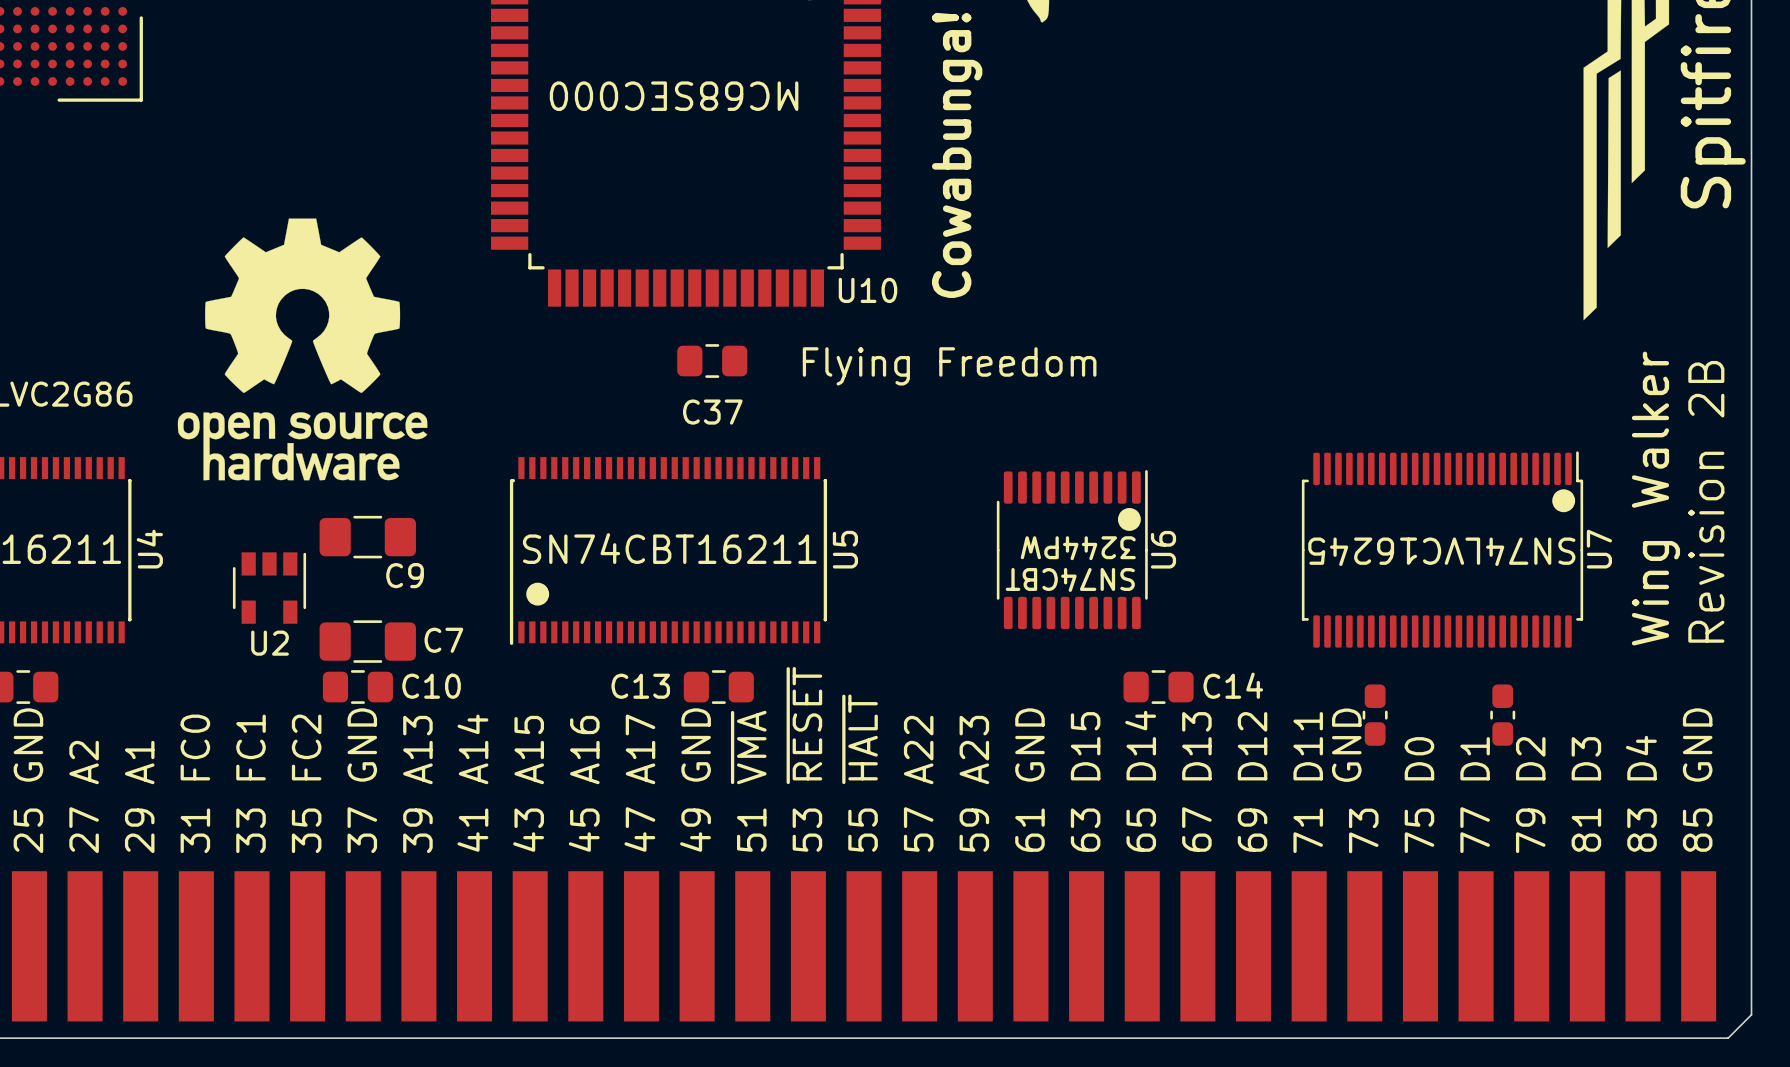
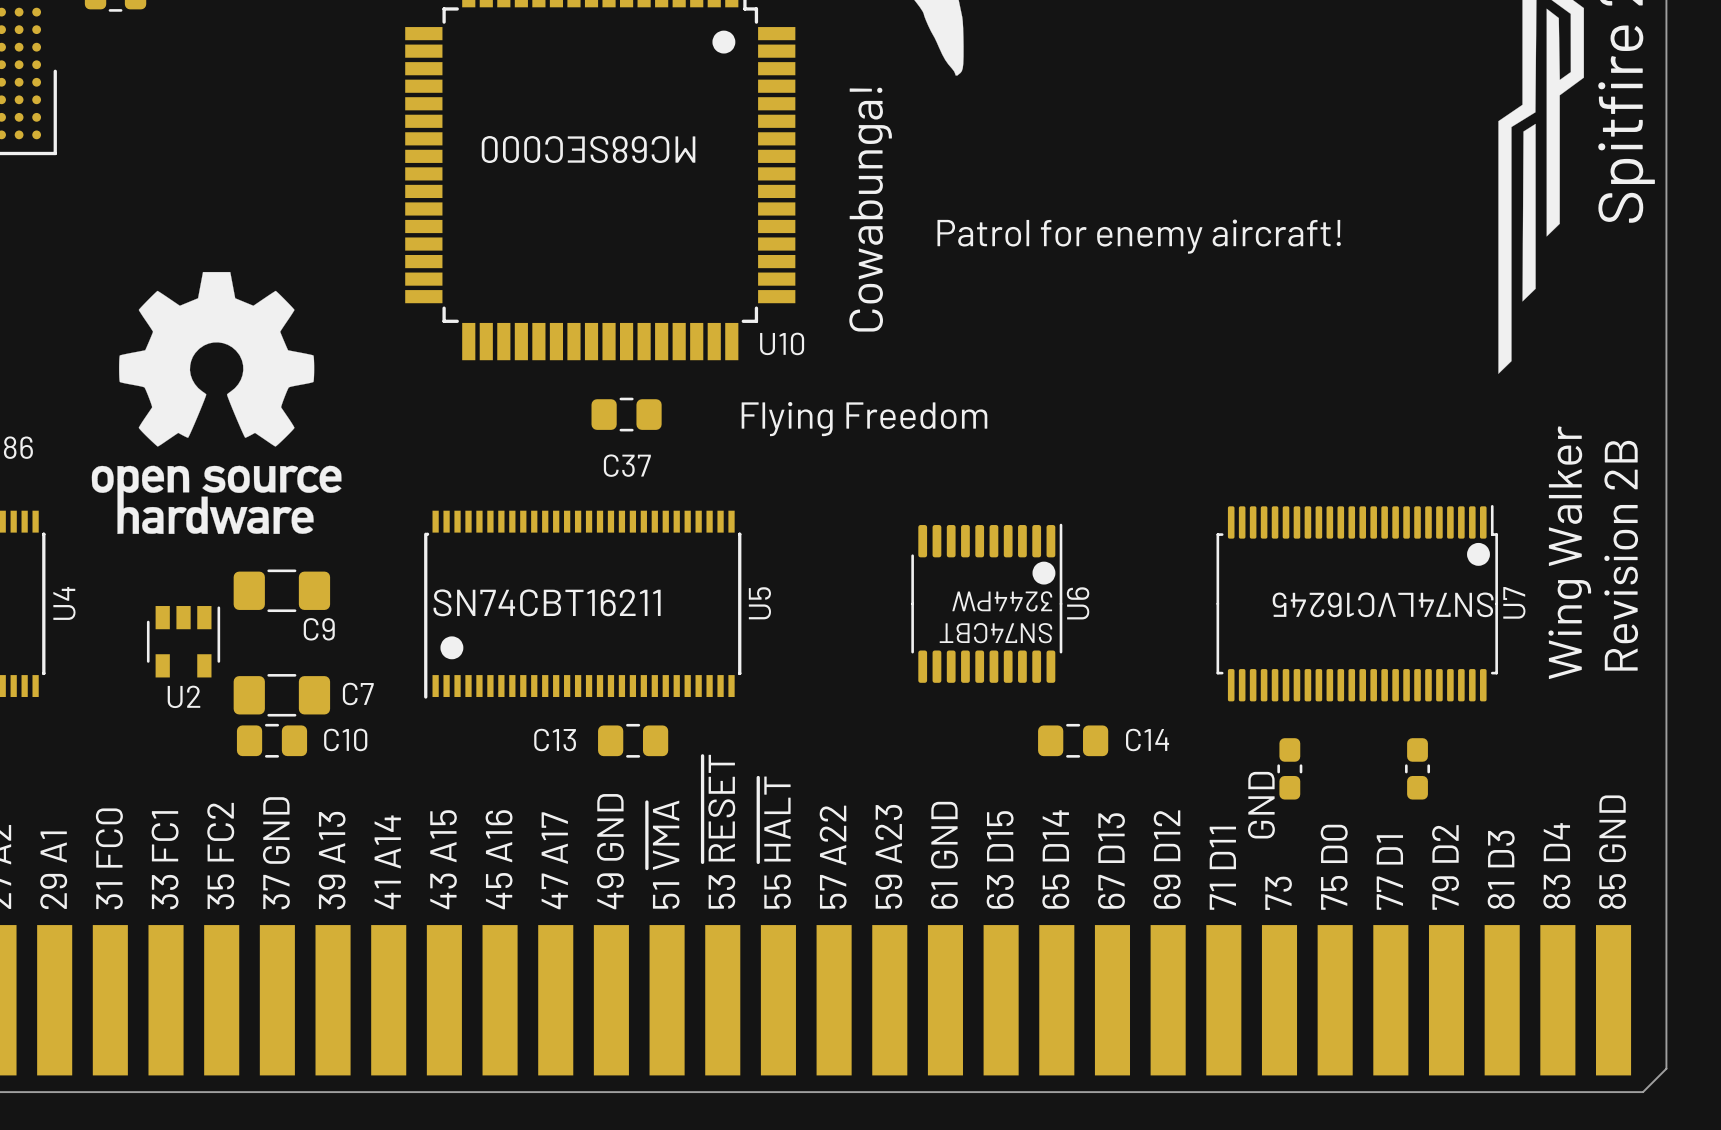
text: none -> Patrol for enemy aircraft! (1139, 236)

